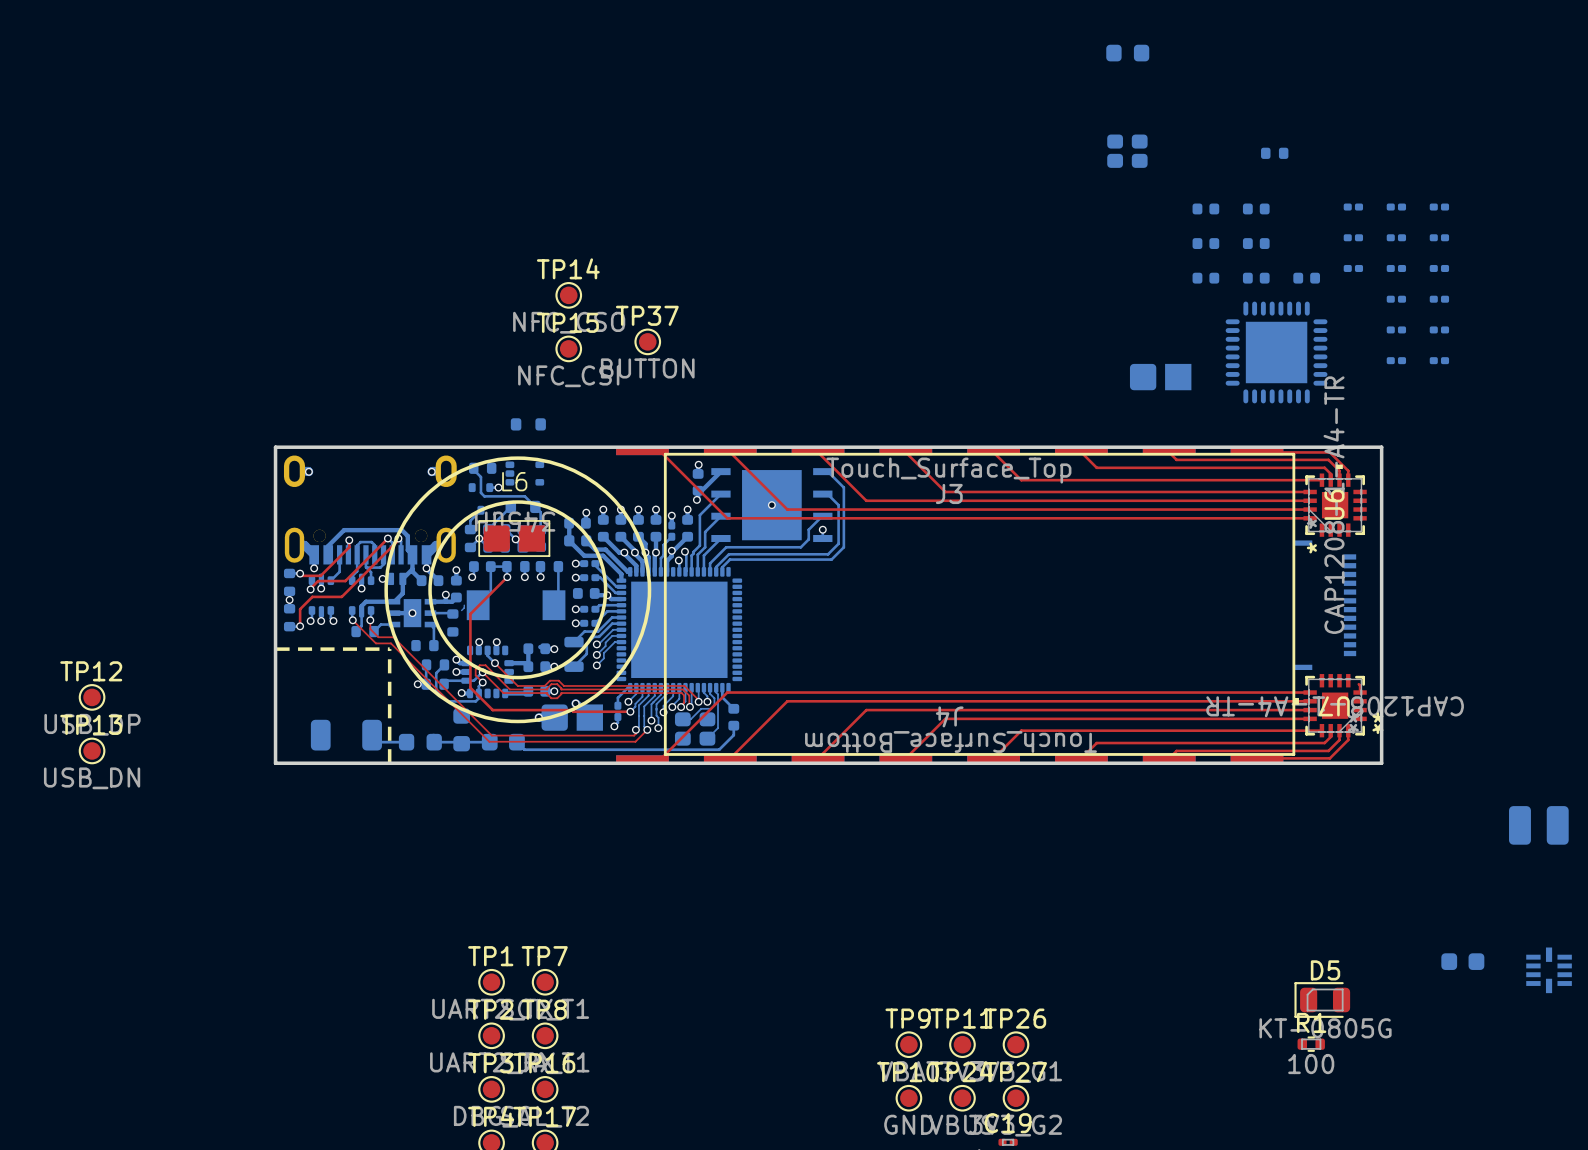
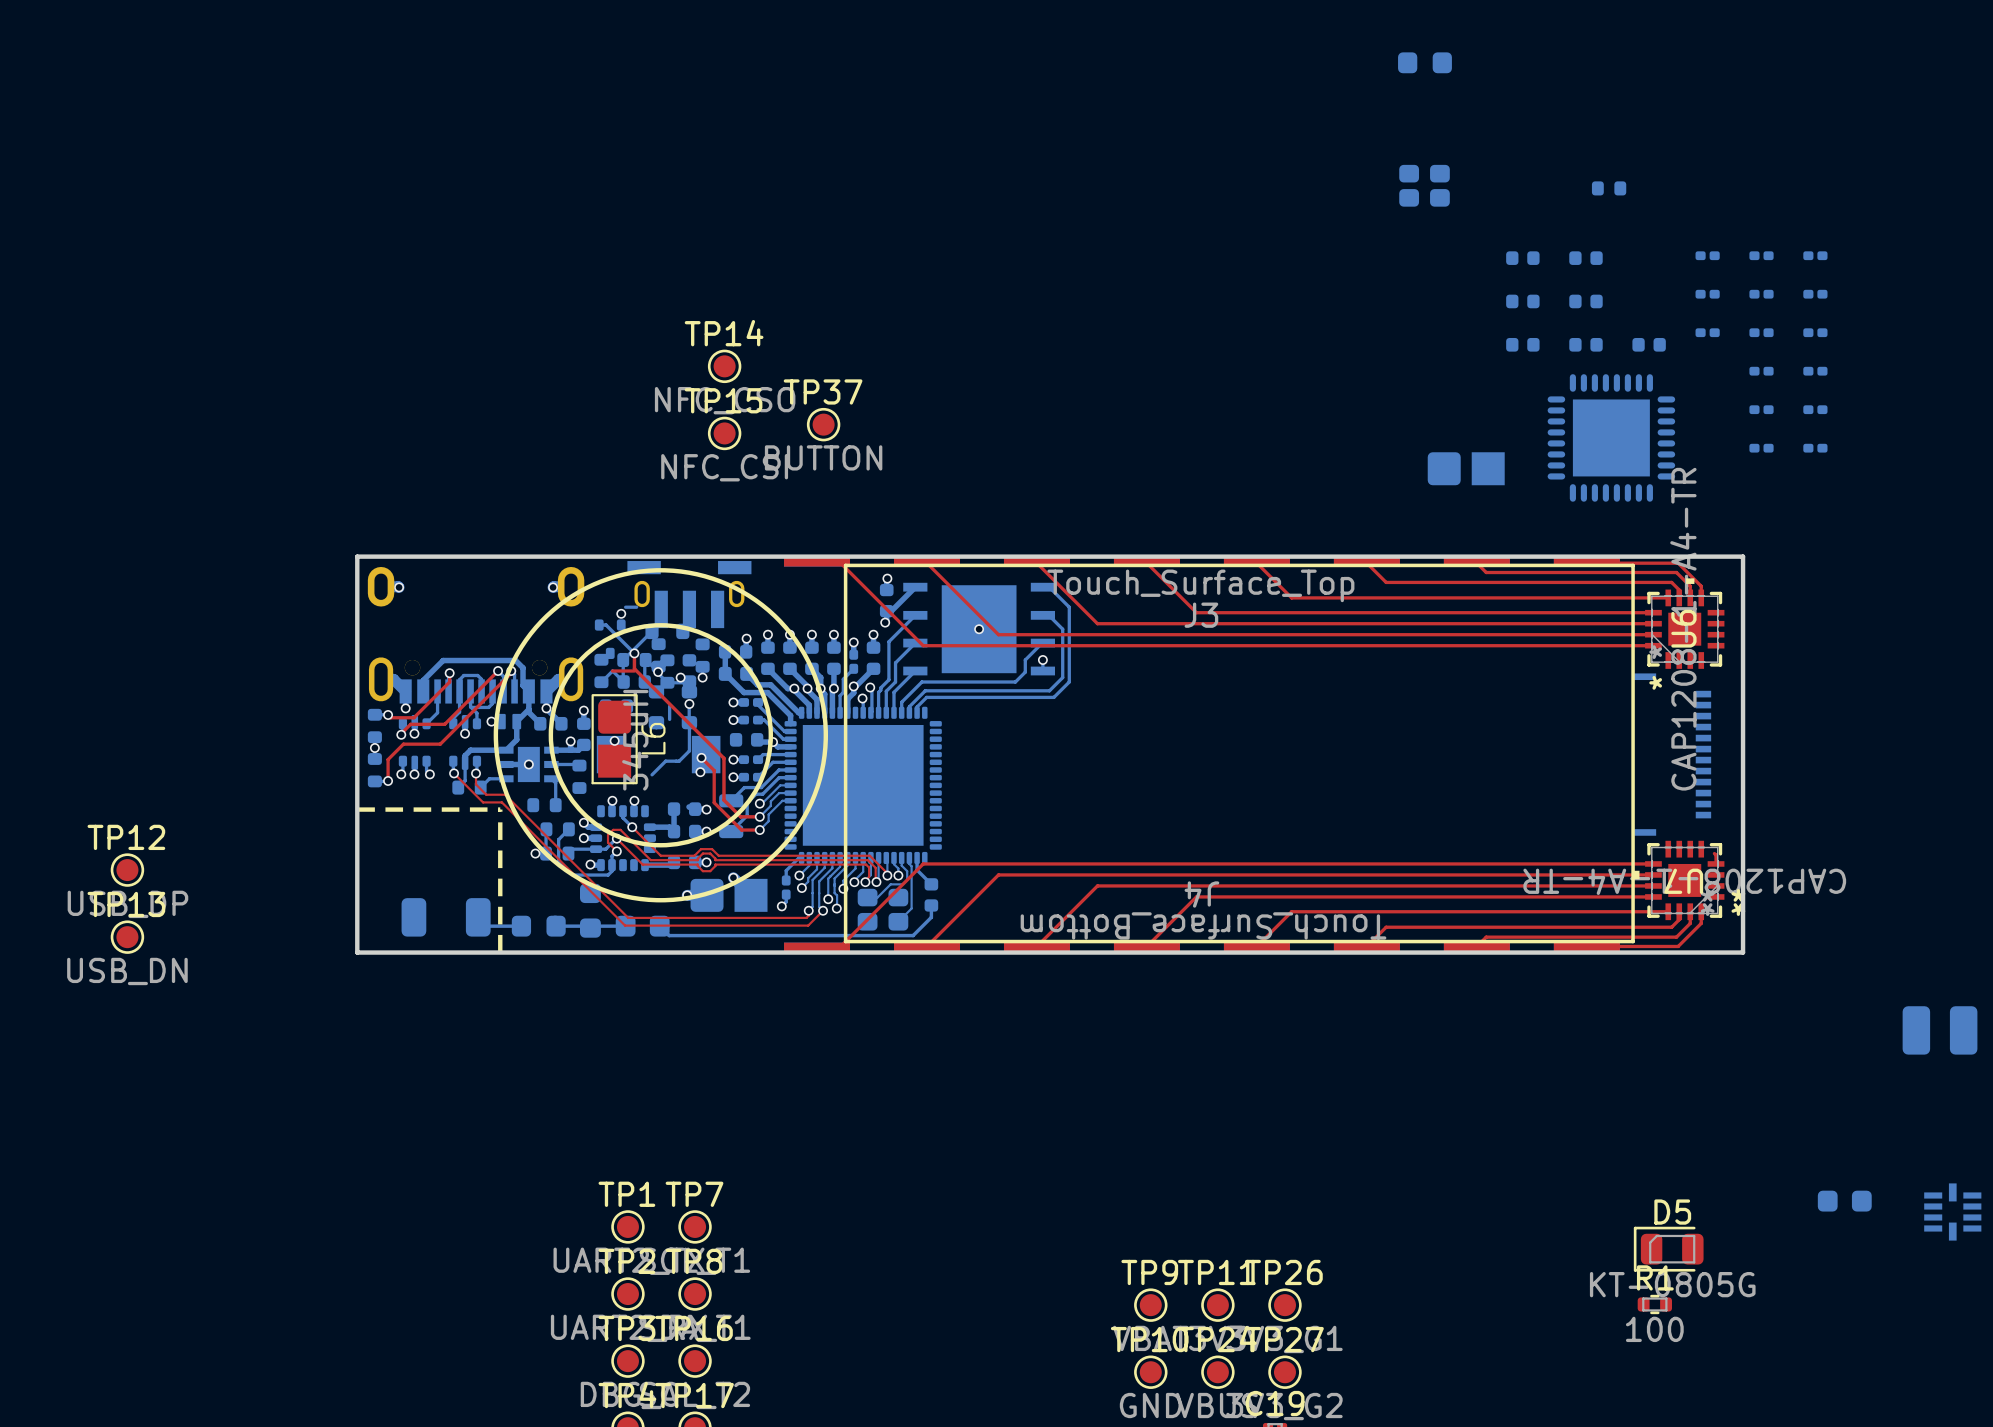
part: (528, 424) -> none
part footprint: [505, 461, 545, 486] -> [627, 561, 752, 629]
bottom track: (473, 468) (480, 477) (480, 492) (484, 496) (524, 496) (540, 512) (540, 529) (523, 529) -> none
part: (482, 468) -> none
via position: (498, 487) -> (621, 613)
part position: (480, 498) -> (610, 639)
bottom track: none -> (599, 627) (599, 625) (606, 625) (634, 653)
bottom track: (480, 510) (470, 520) (470, 529) -> none
top track: none -> (634, 653) (634, 668) (723, 758) (723, 800) (740, 816) (759, 816)
via: none -> (634, 653)
part: none -> (658, 655)
part: none -> (702, 655)
via: (479, 538) -> none
L6 rotation: 0° (514, 538) -> 90° clockwise (614, 739)
L6 position: (514, 538) -> (614, 739)
via: none -> (680, 677)
via: none -> (702, 677)
part footprint: [502, 560, 530, 573] -> [648, 685, 665, 730]
part footprint: [535, 560, 564, 573] -> [681, 685, 698, 730]
via: none -> (689, 703)
bottom track: (558, 566) (558, 600) (553, 605) -> none
via: (472, 577) -> none
bottom track: (507, 577) (506, 566) (490, 566) (490, 592) (478, 605) -> none
top track: (507, 577) (470, 614) (470, 687) (492, 710) (630, 711) -> none
via: (507, 577) -> none
via: (524, 577) -> none
via: (540, 577) -> none
bottom track: none -> (689, 722) (689, 750) (679, 761) (665, 761) (652, 774)
via: none -> (614, 740)
bottom track: (464, 605) (461, 610) -> none
top track: none -> (701, 757) (714, 770) (714, 802) (741, 830) (759, 830)
via: none -> (701, 757)
via: none -> (700, 772)

